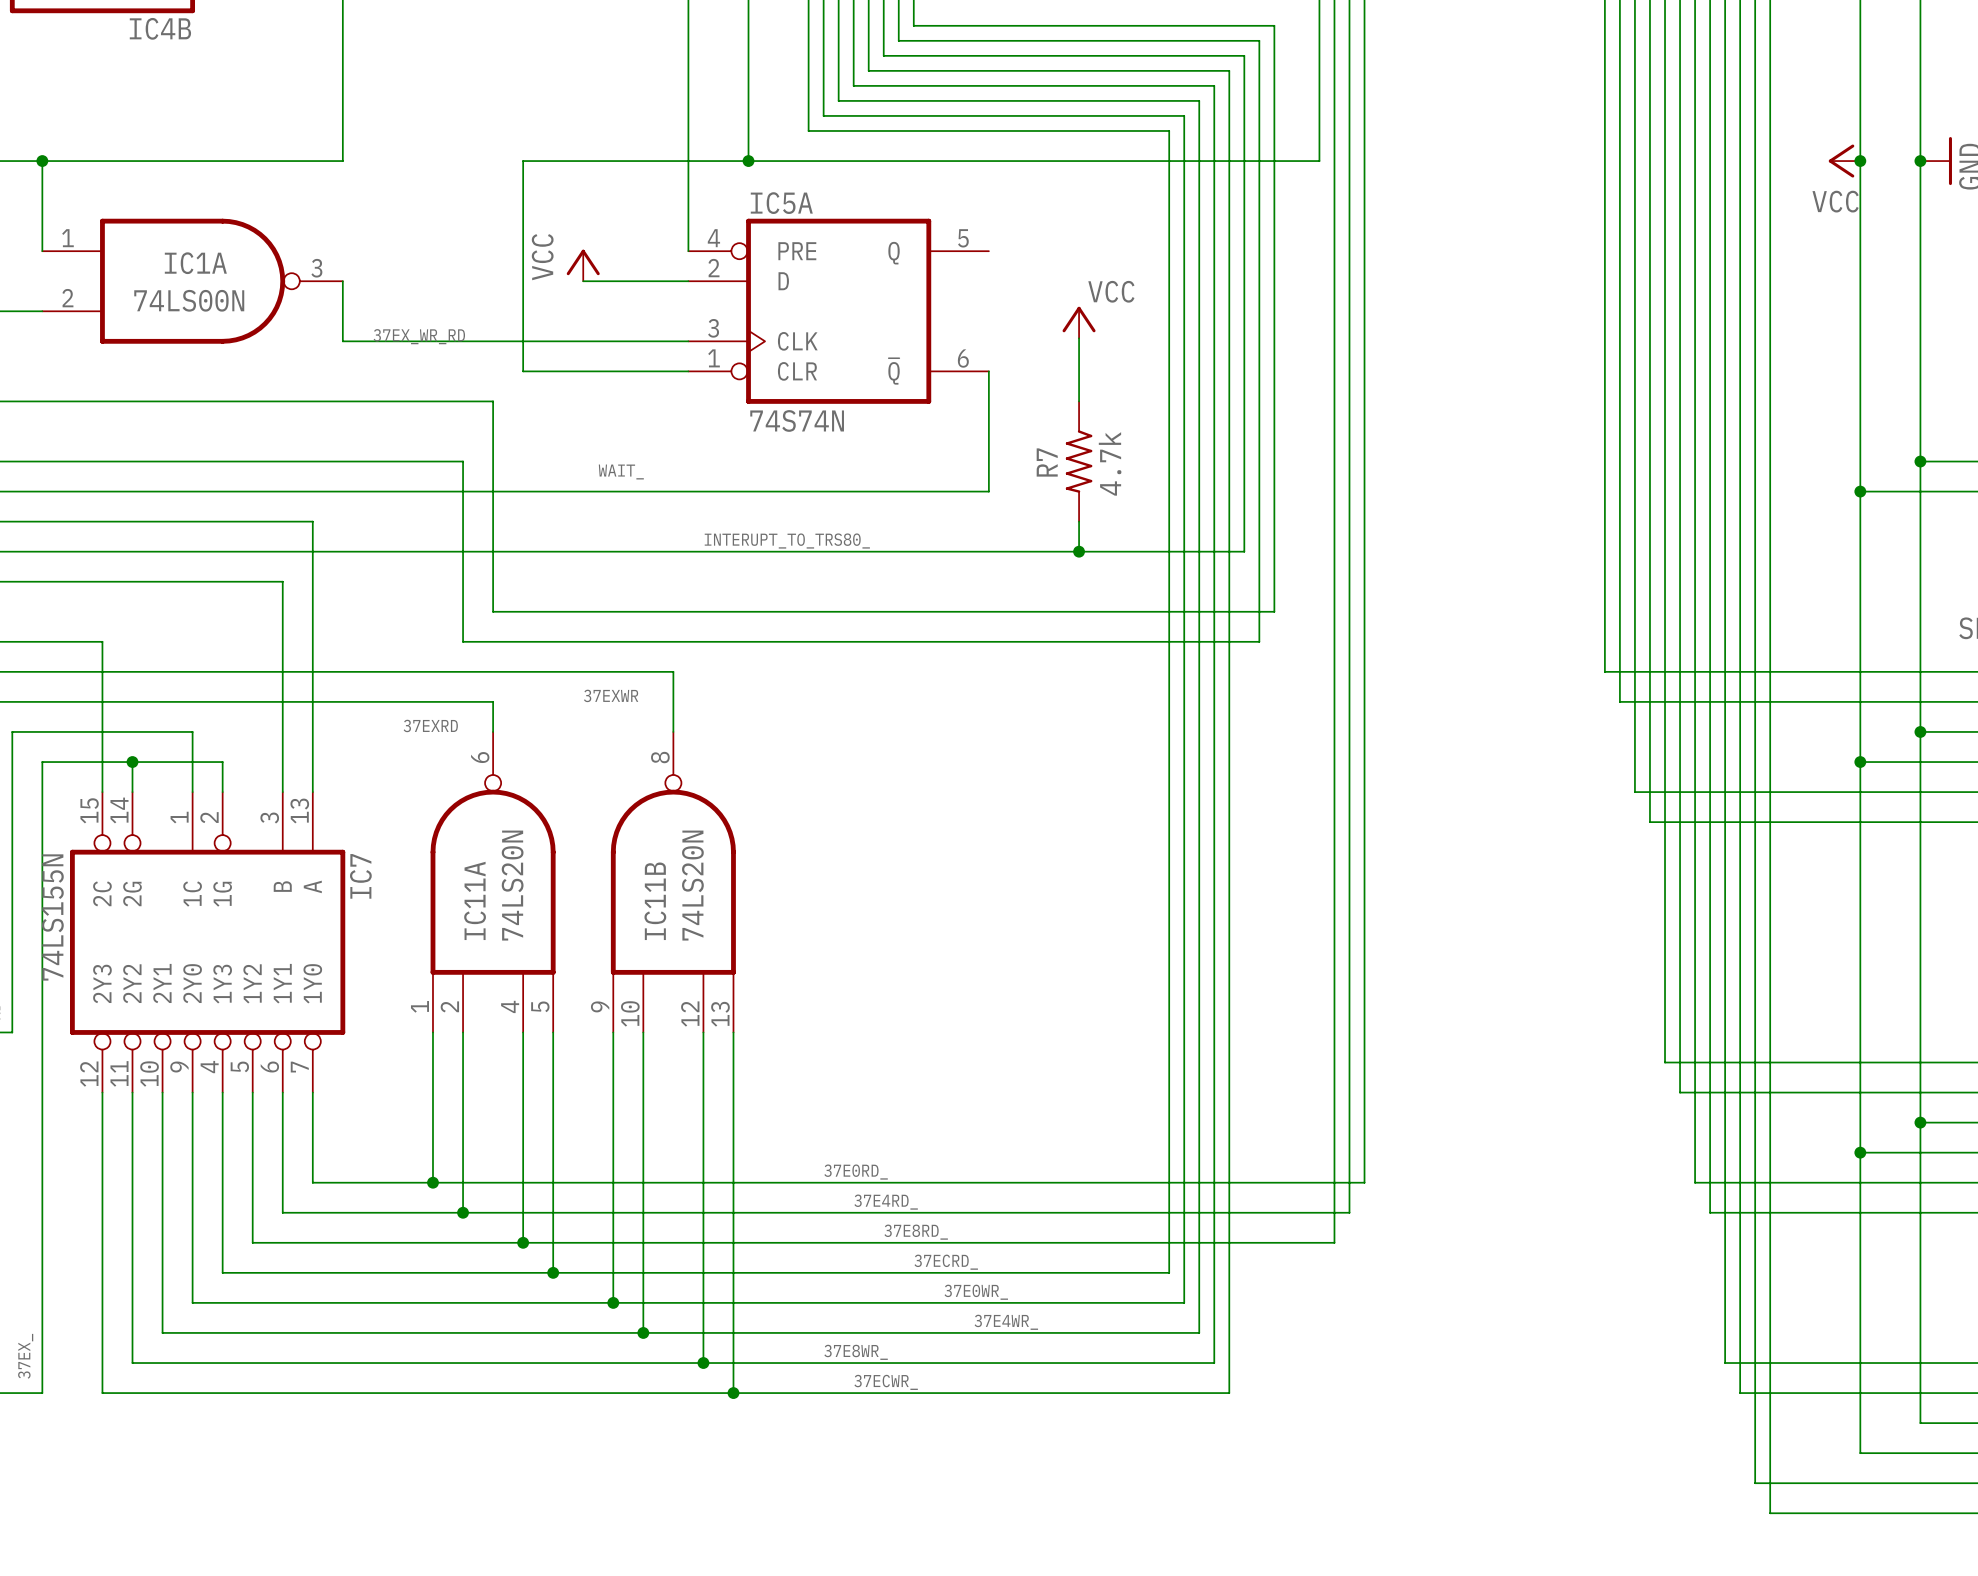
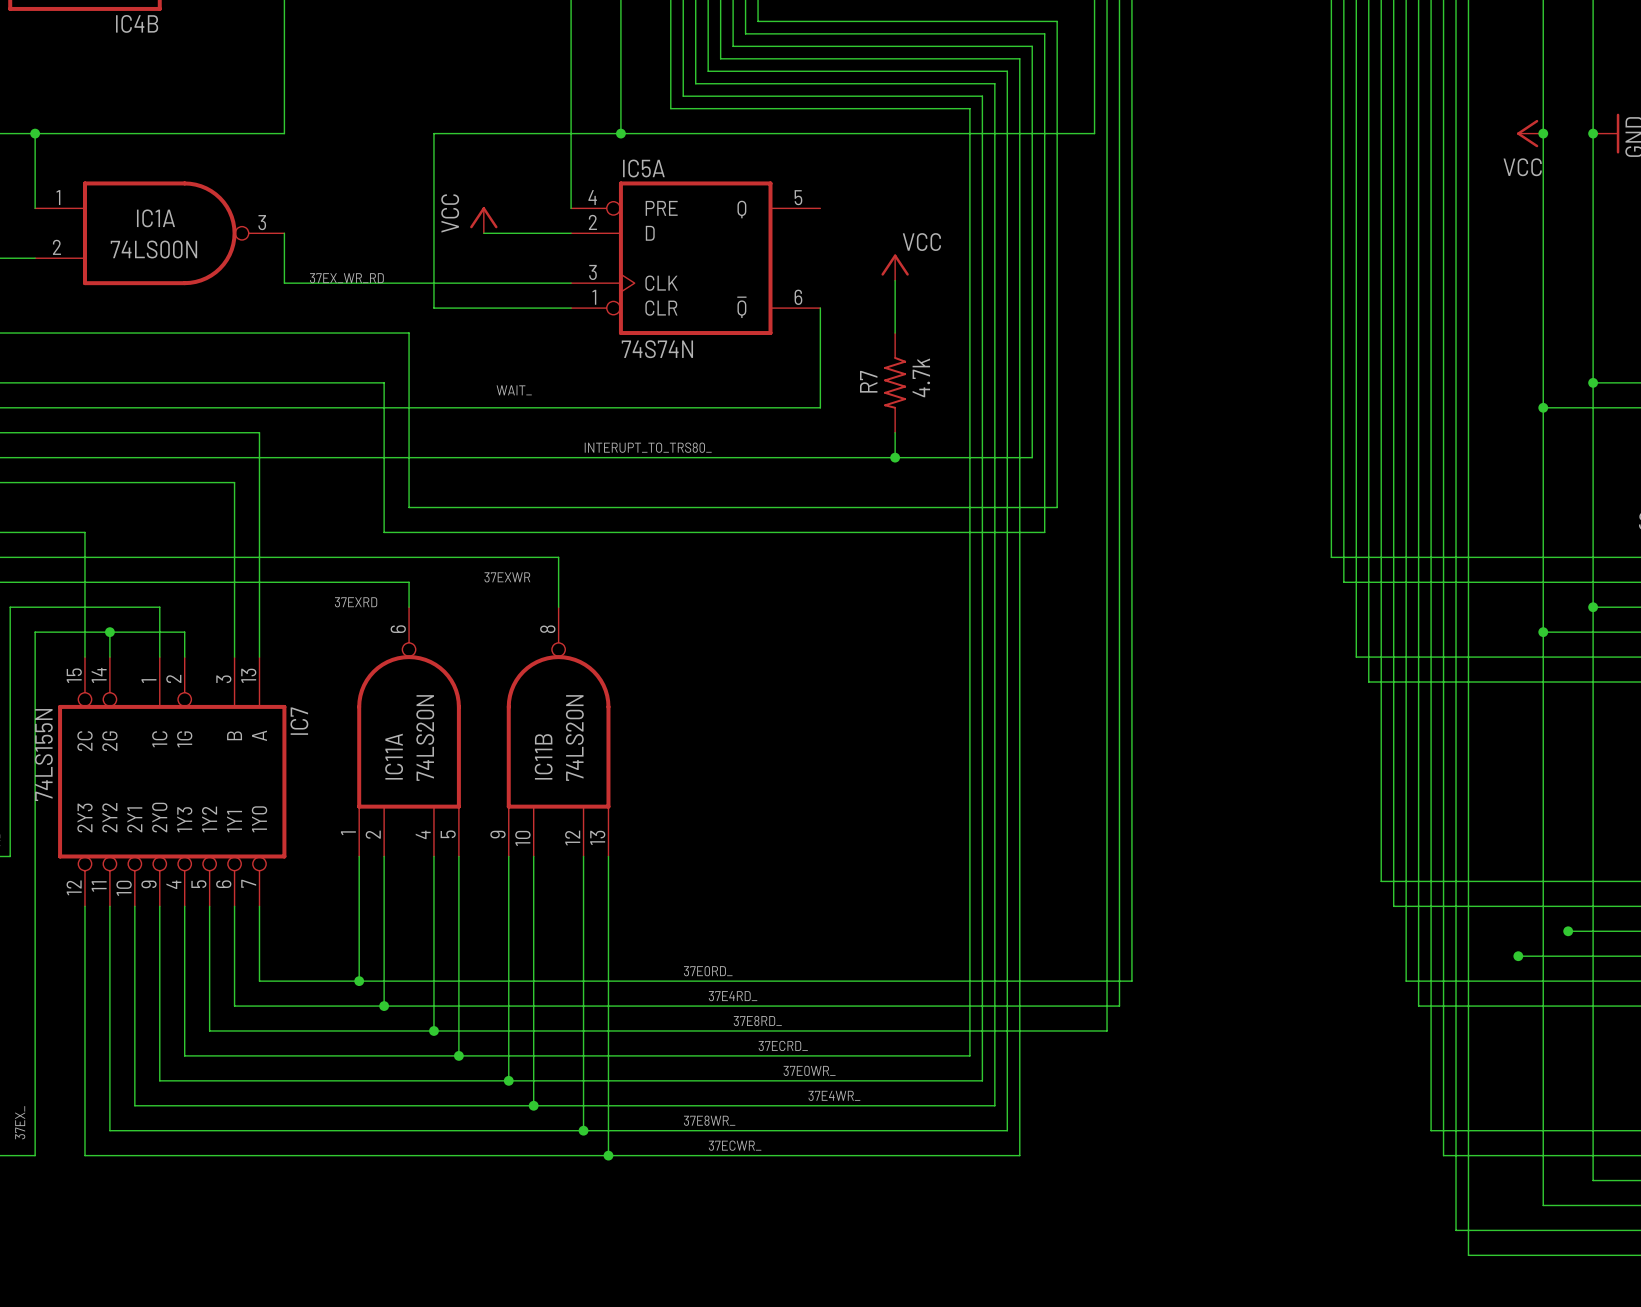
wire: none -> (1568, 931) (1593, 931)
junction: none -> (1568, 931)
junction: (1920, 1122) -> none
wire: none -> (1518, 956) (1543, 956)
junction: none -> (1518, 956)
junction: (1860, 1152) -> none

